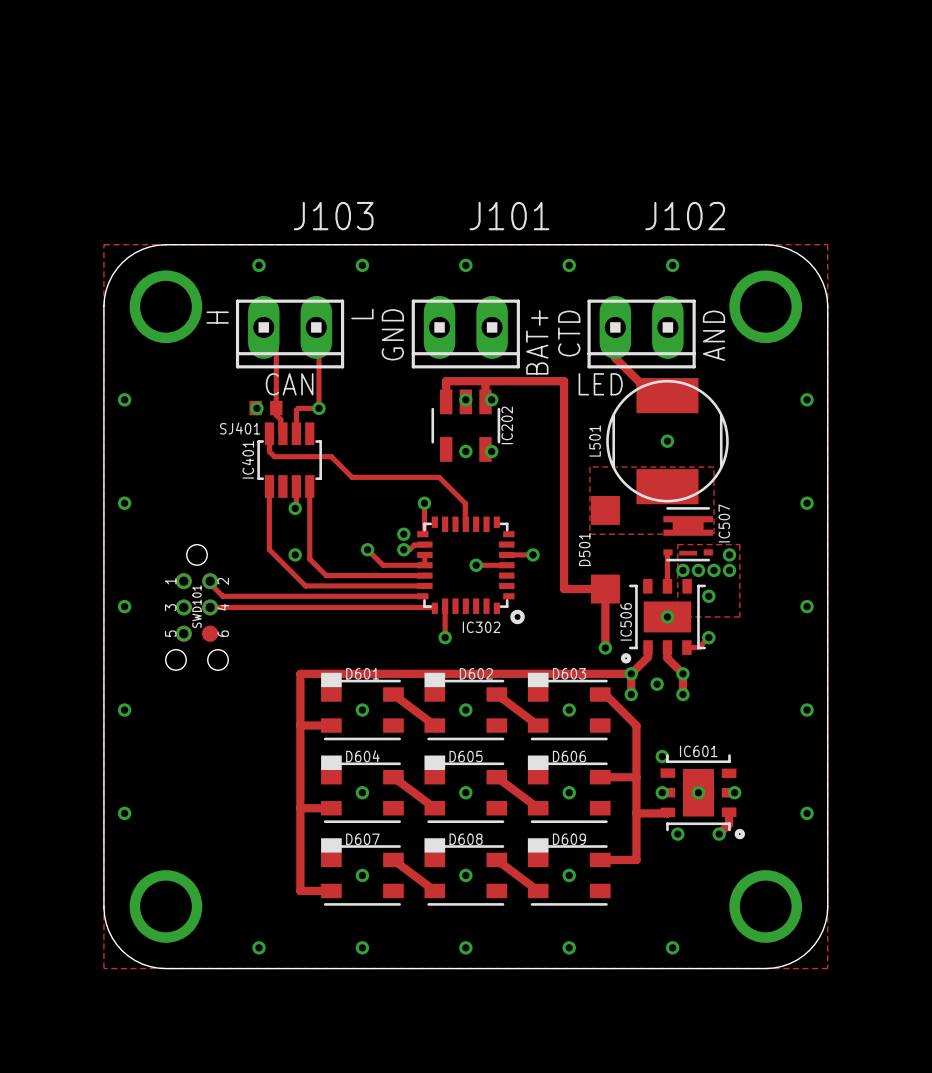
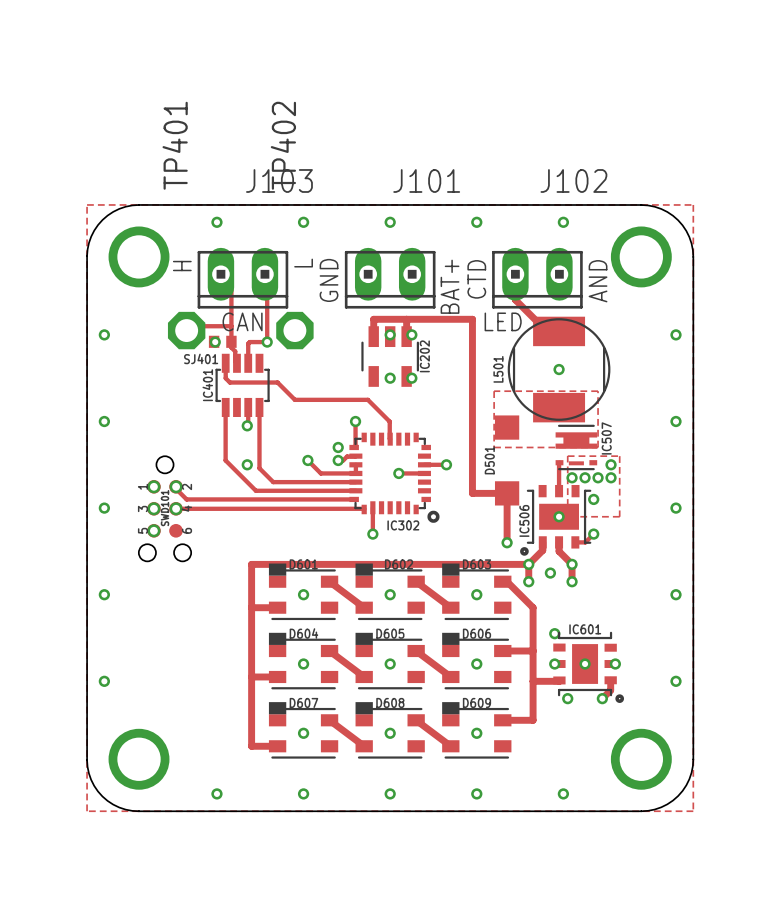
track: none -> (231, 326) (190, 326) (186, 330)
TP401: none -> (186, 330)
TP402: none -> (294, 330)

